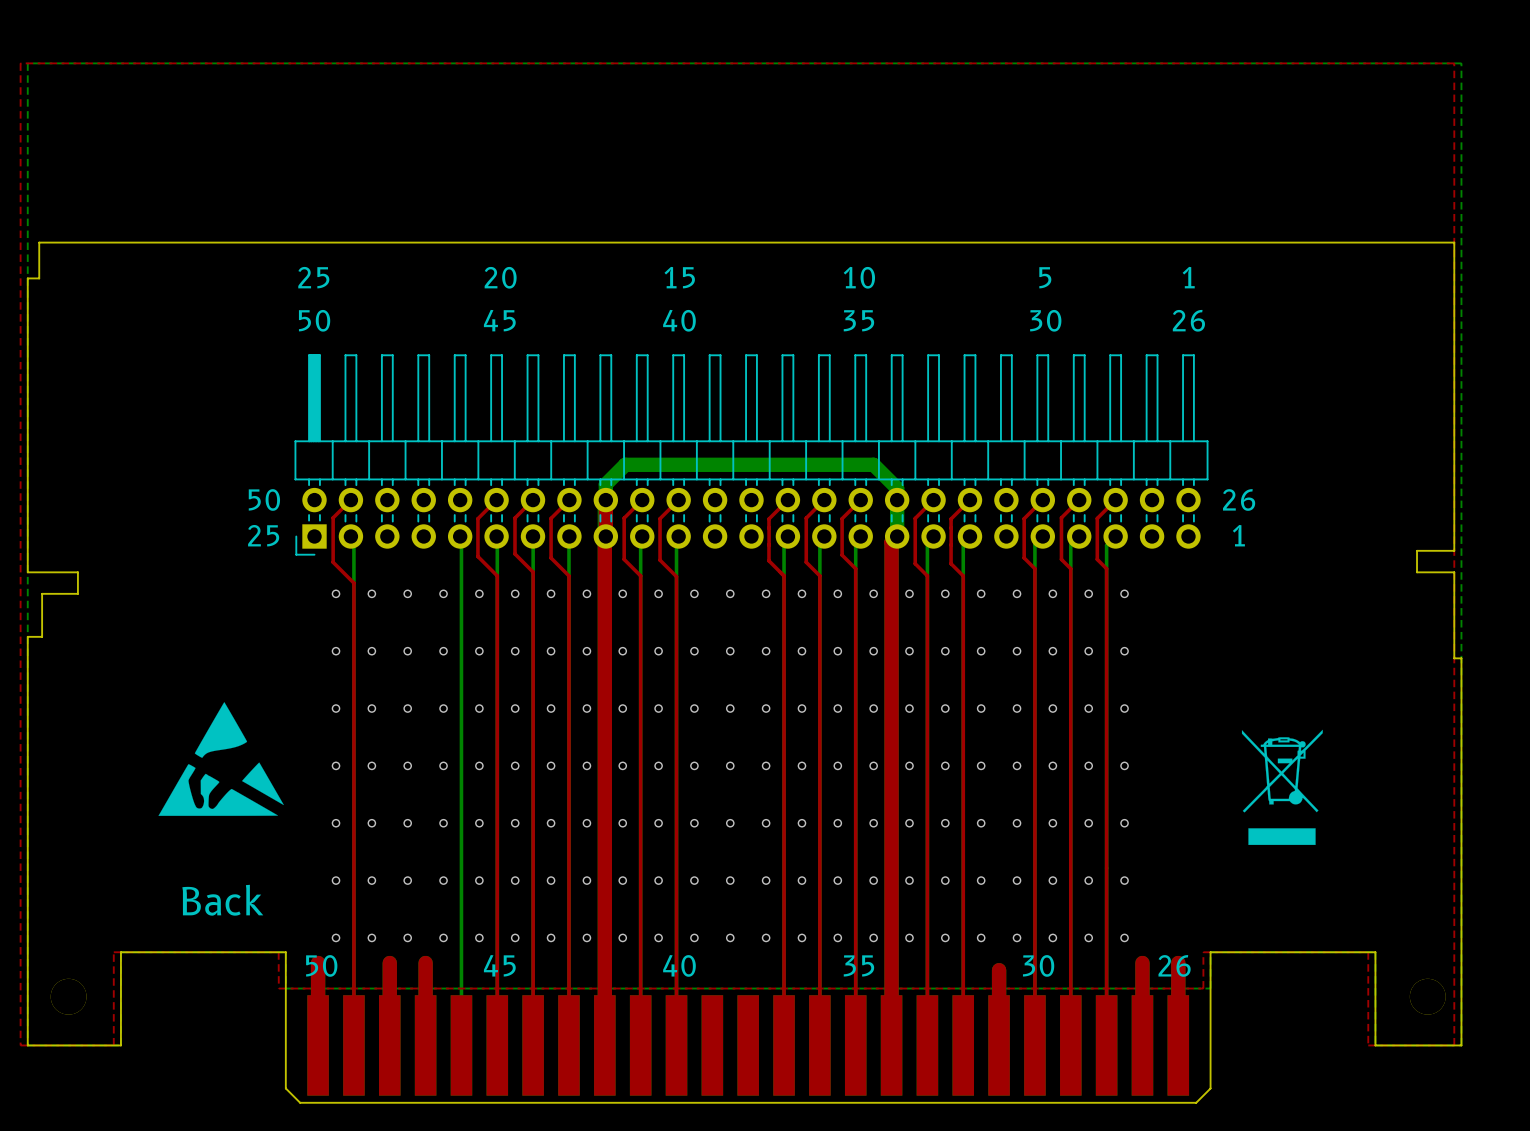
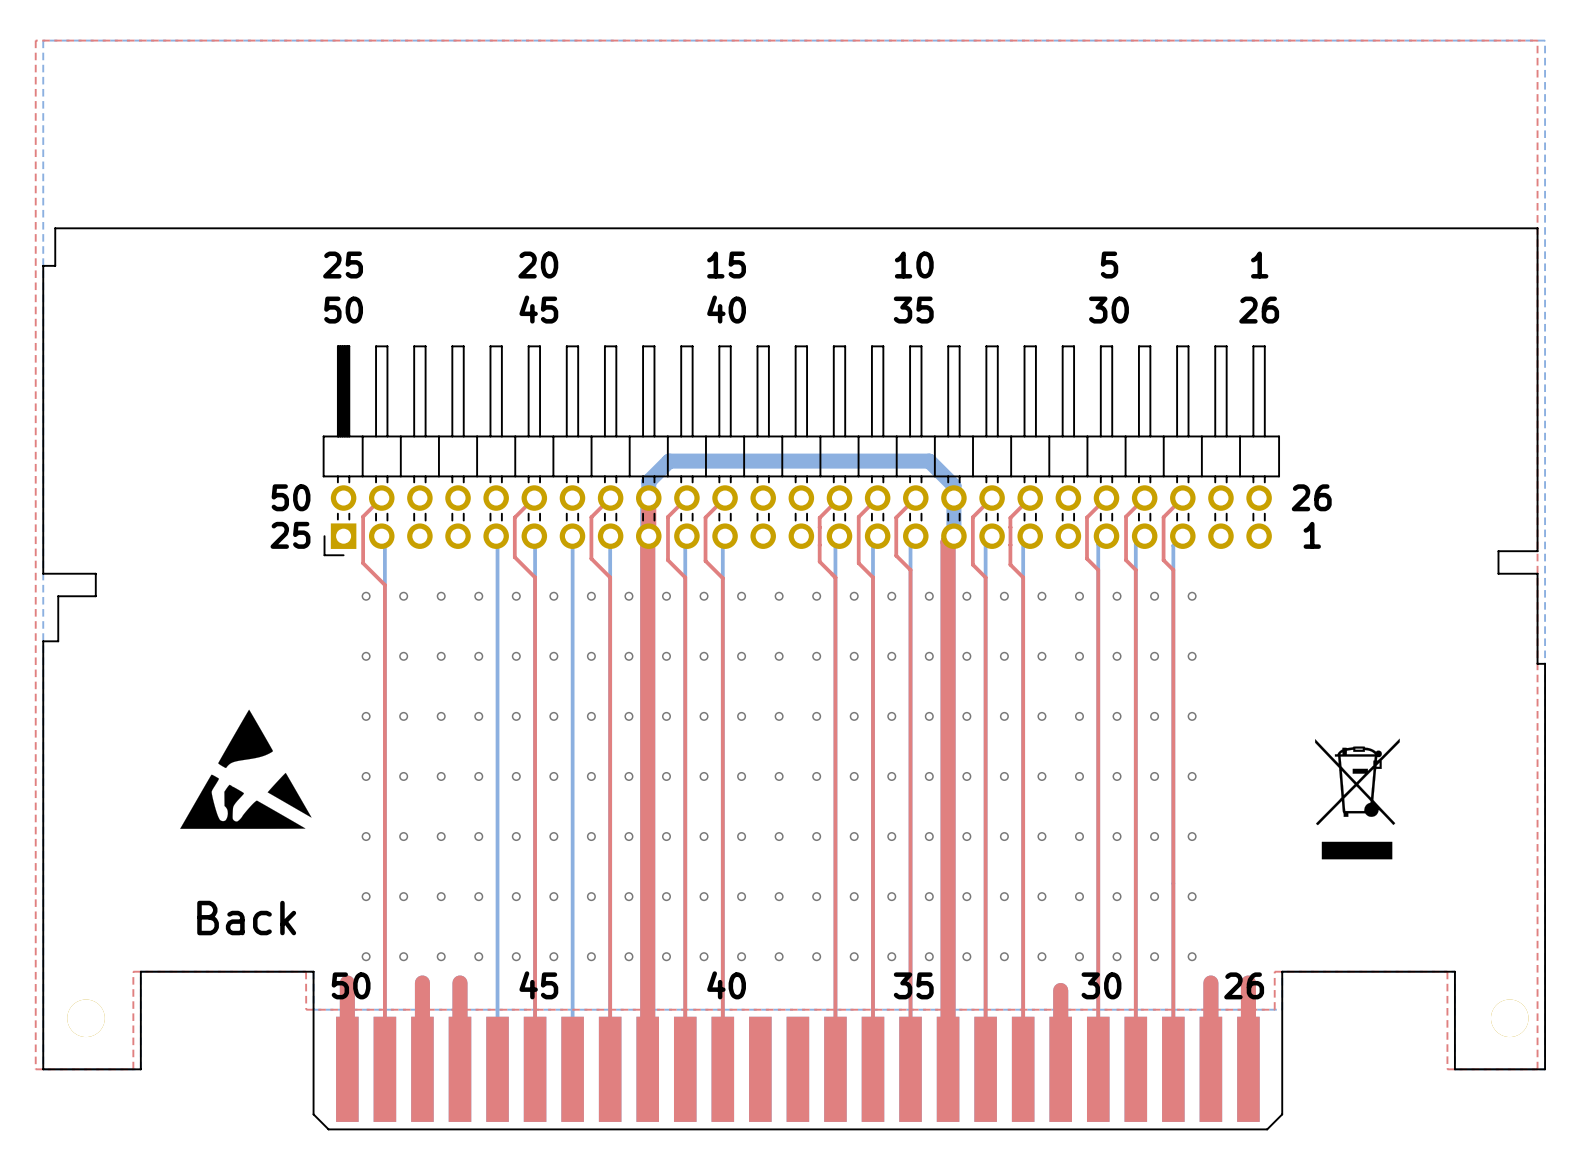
top track: (533, 500) (515, 518) (515, 553) (533, 572) (533, 1045) -> none

